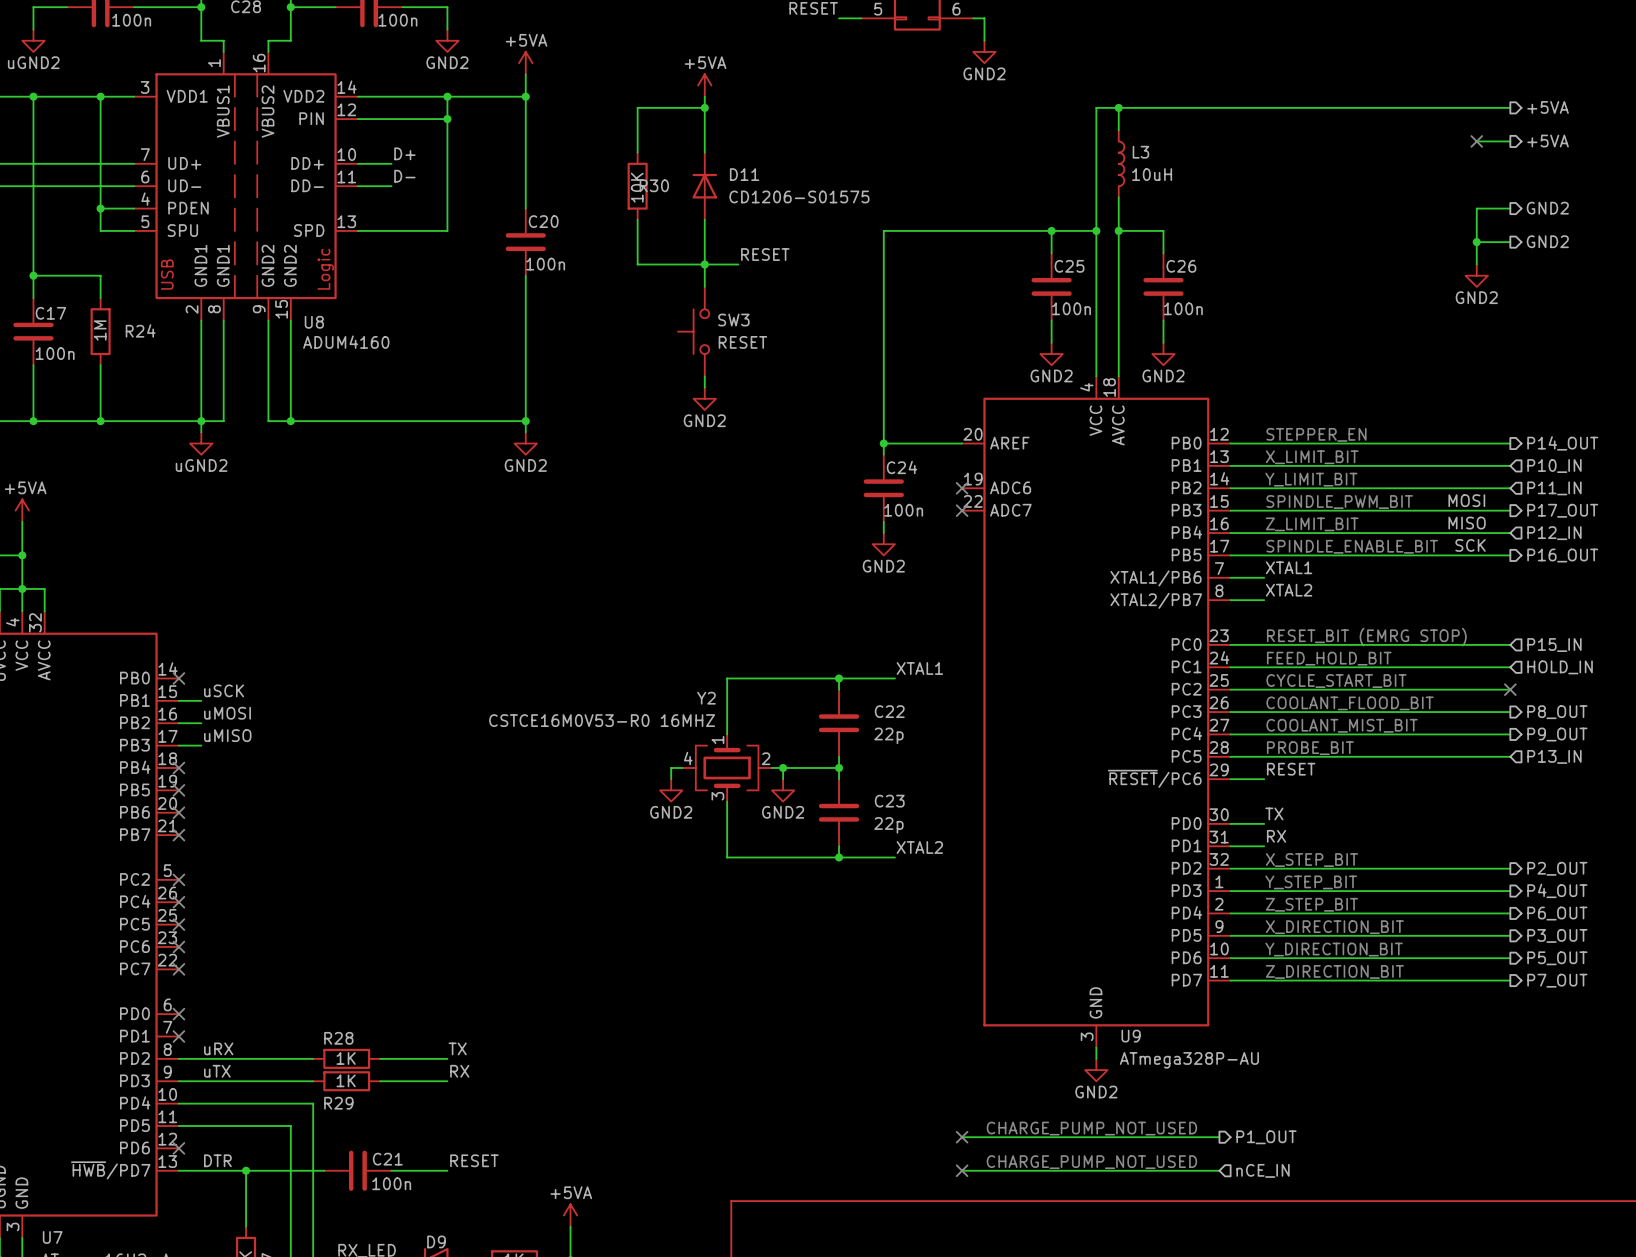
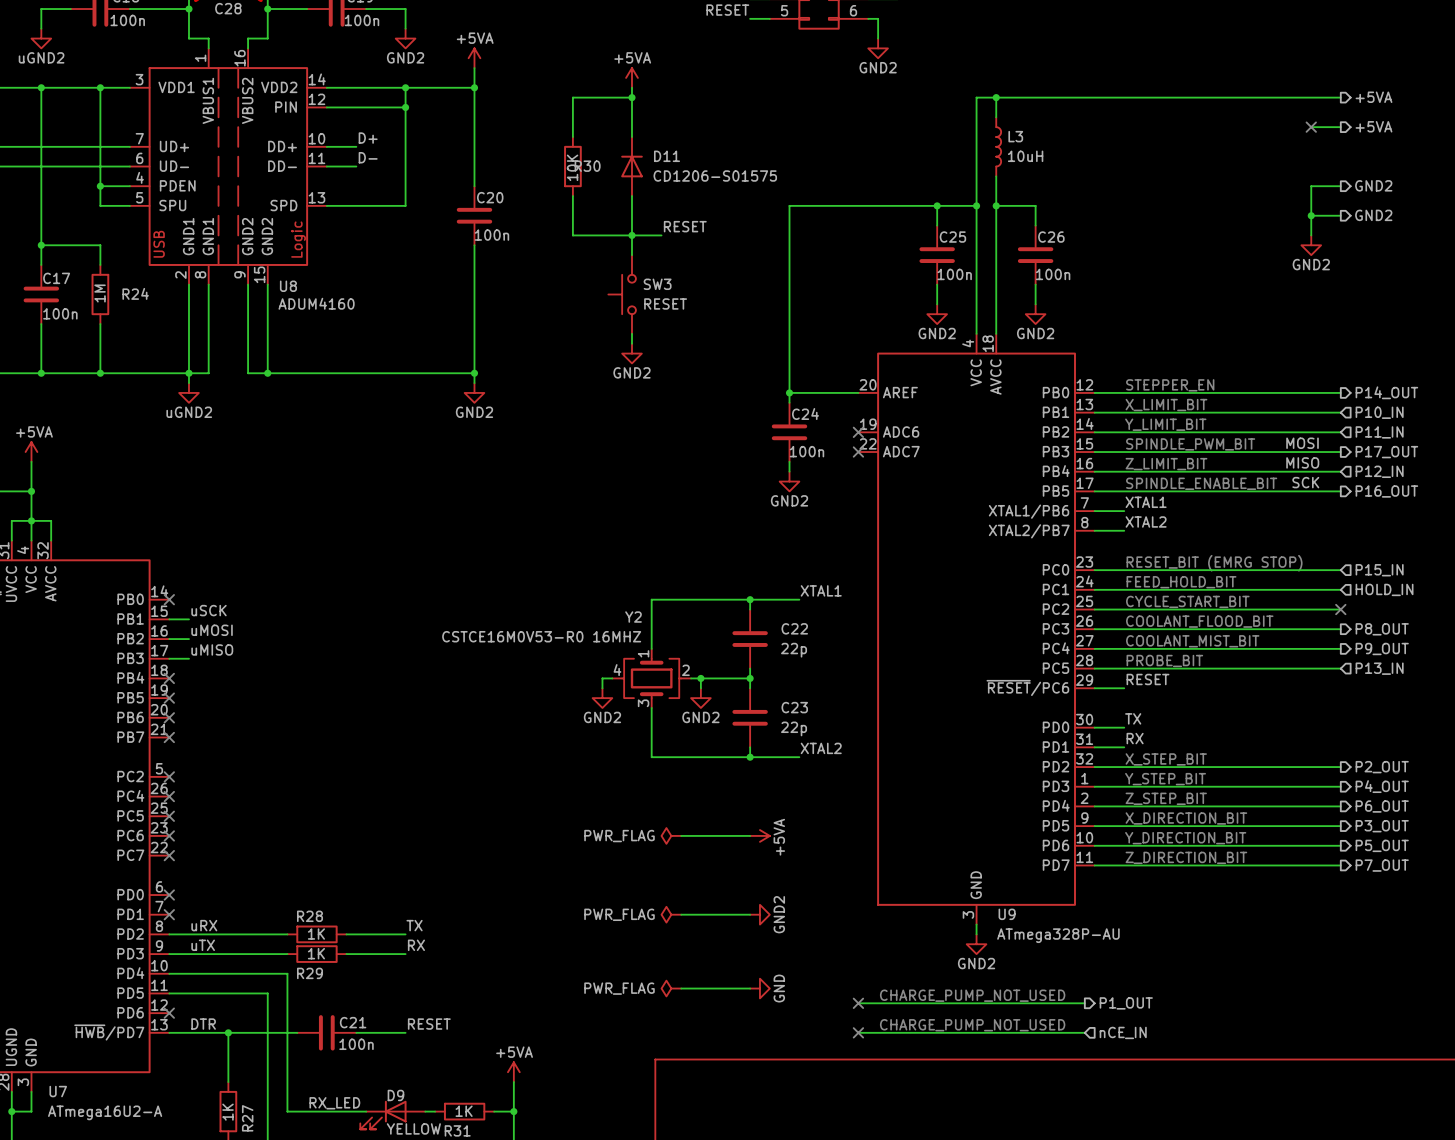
power symbol: none -> PWR_FLAG (671, 835)
wire: none -> (681, 835) (750, 835)
power symbol: none -> +5VA (759, 835)
power symbol: none -> PWR_FLAG (671, 914)
wire: none -> (681, 914) (750, 914)
power symbol: none -> GND2 (759, 914)
power symbol: none -> PWR_FLAG (671, 988)
wire: none -> (681, 988) (750, 988)
power symbol: none -> GND (759, 988)

